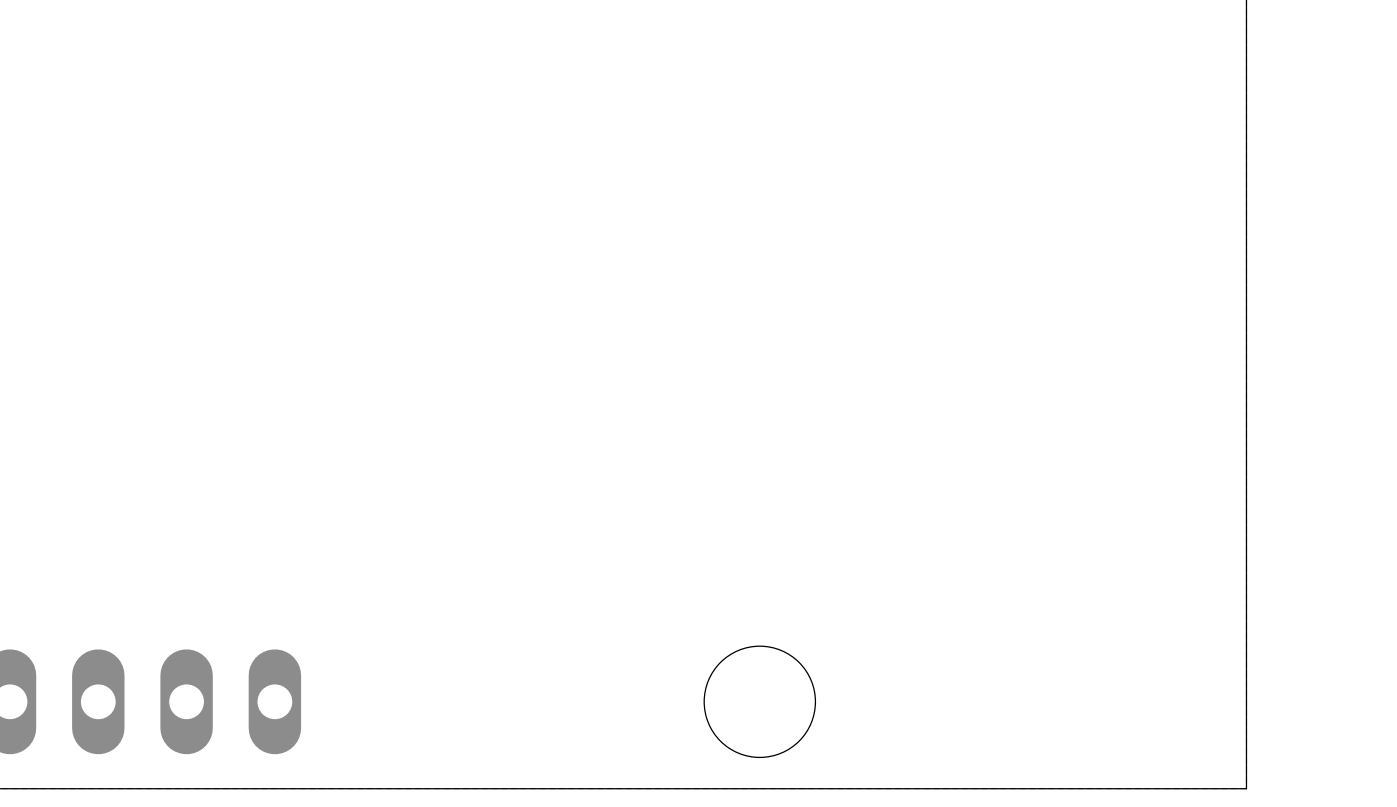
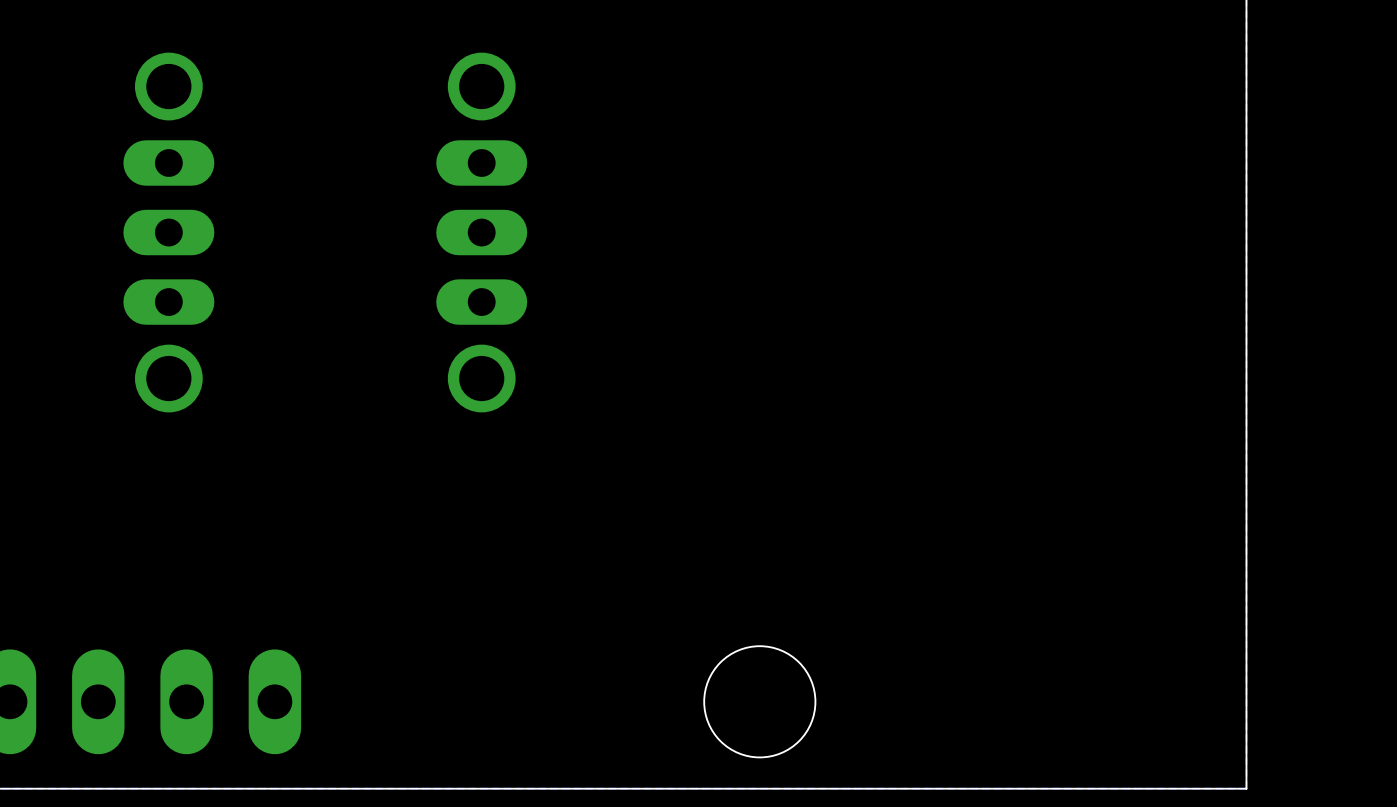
part: none -> (168, 232)
part: none -> (481, 232)

